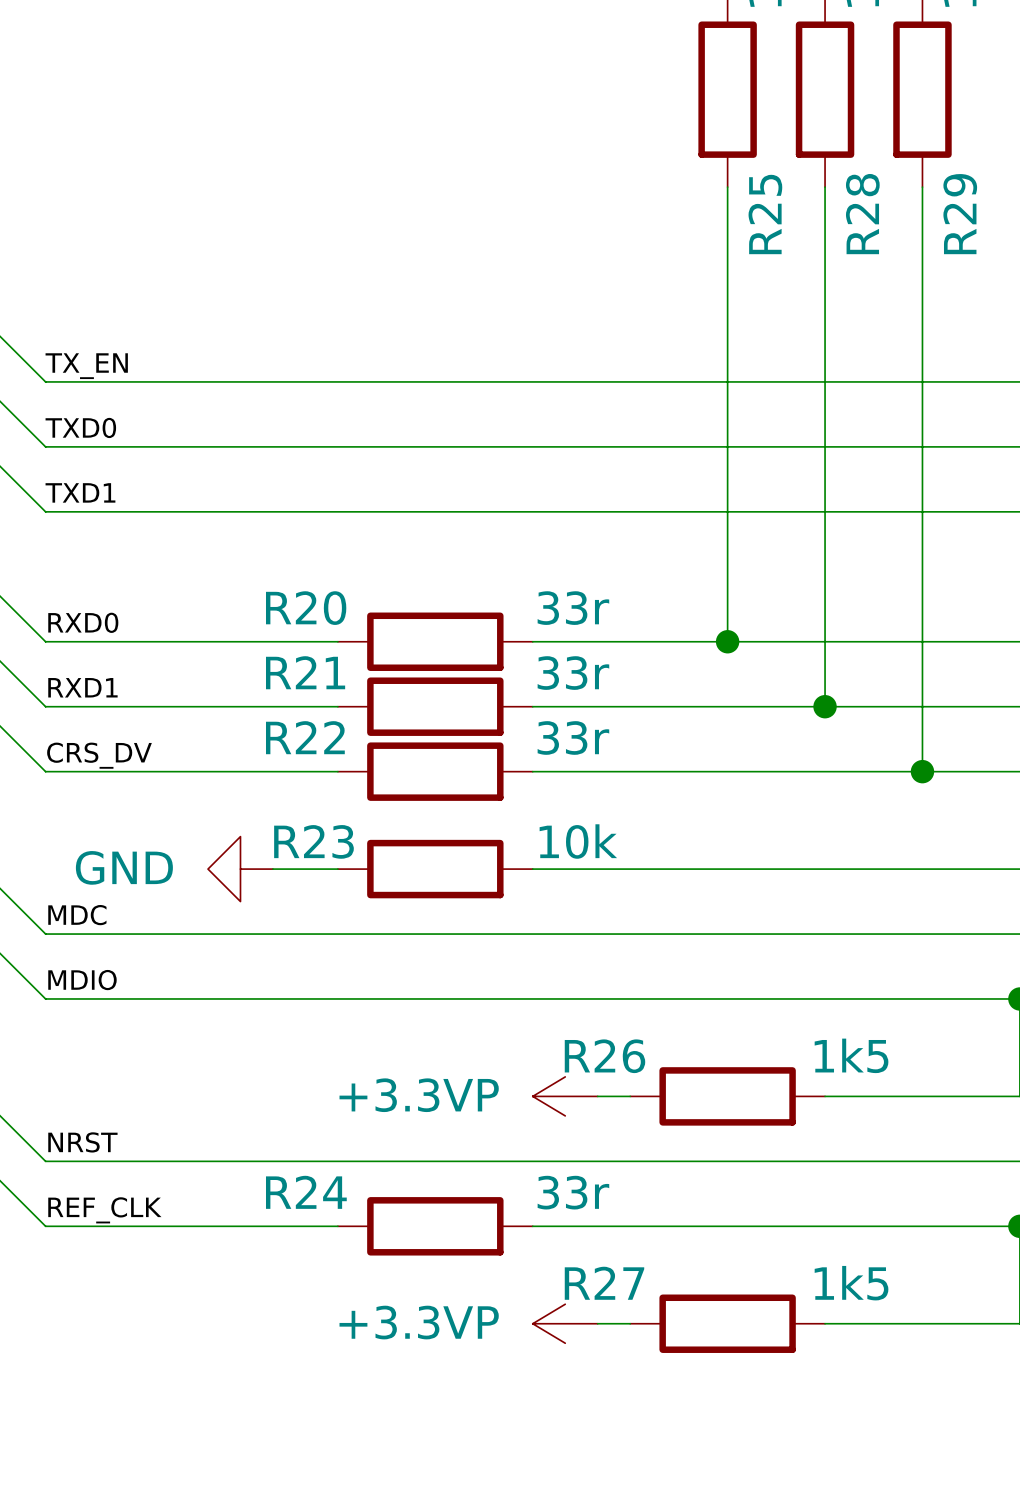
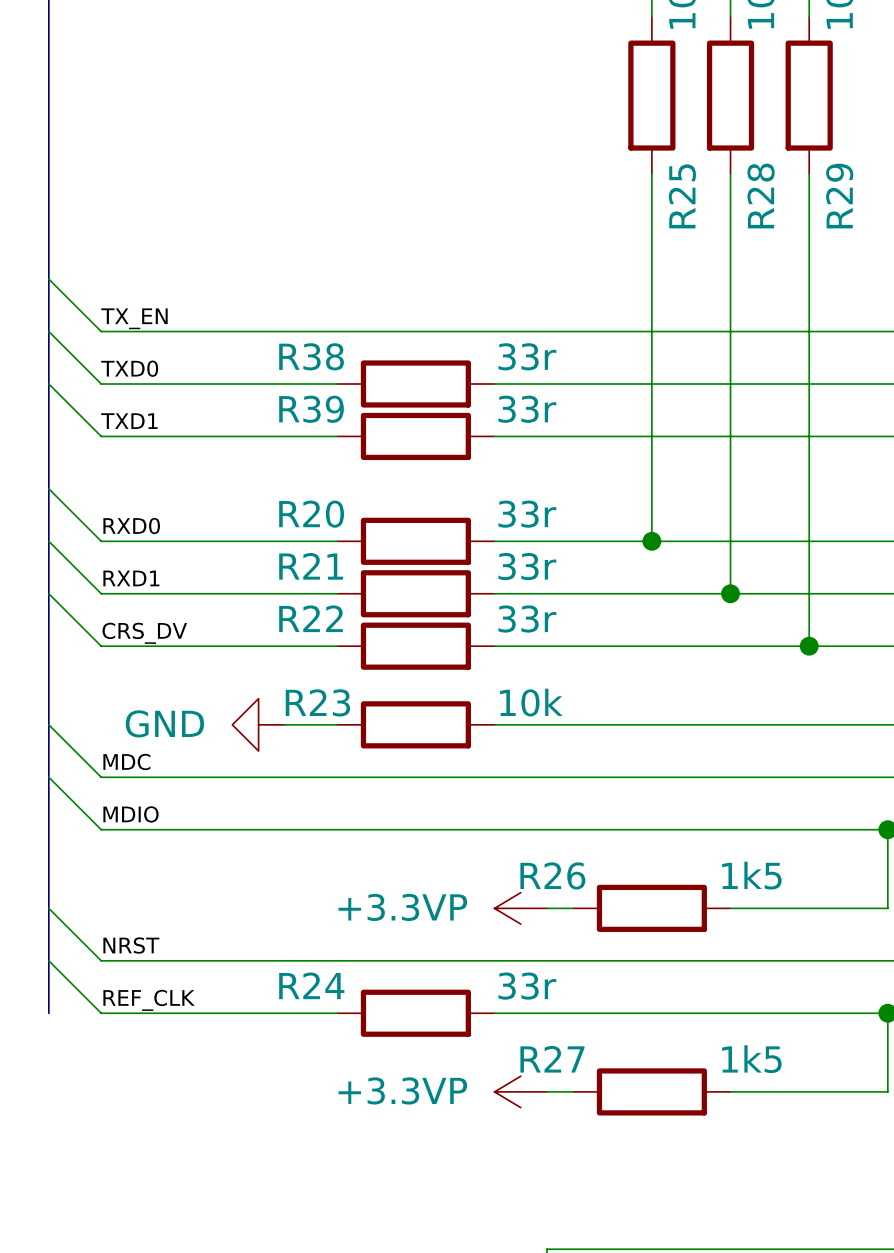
wire: (337, 446) (532, 446) -> none
R38: none -> 33r (415, 383)
wire: (337, 511) (532, 511) -> none
R39: none -> 33r (415, 436)

